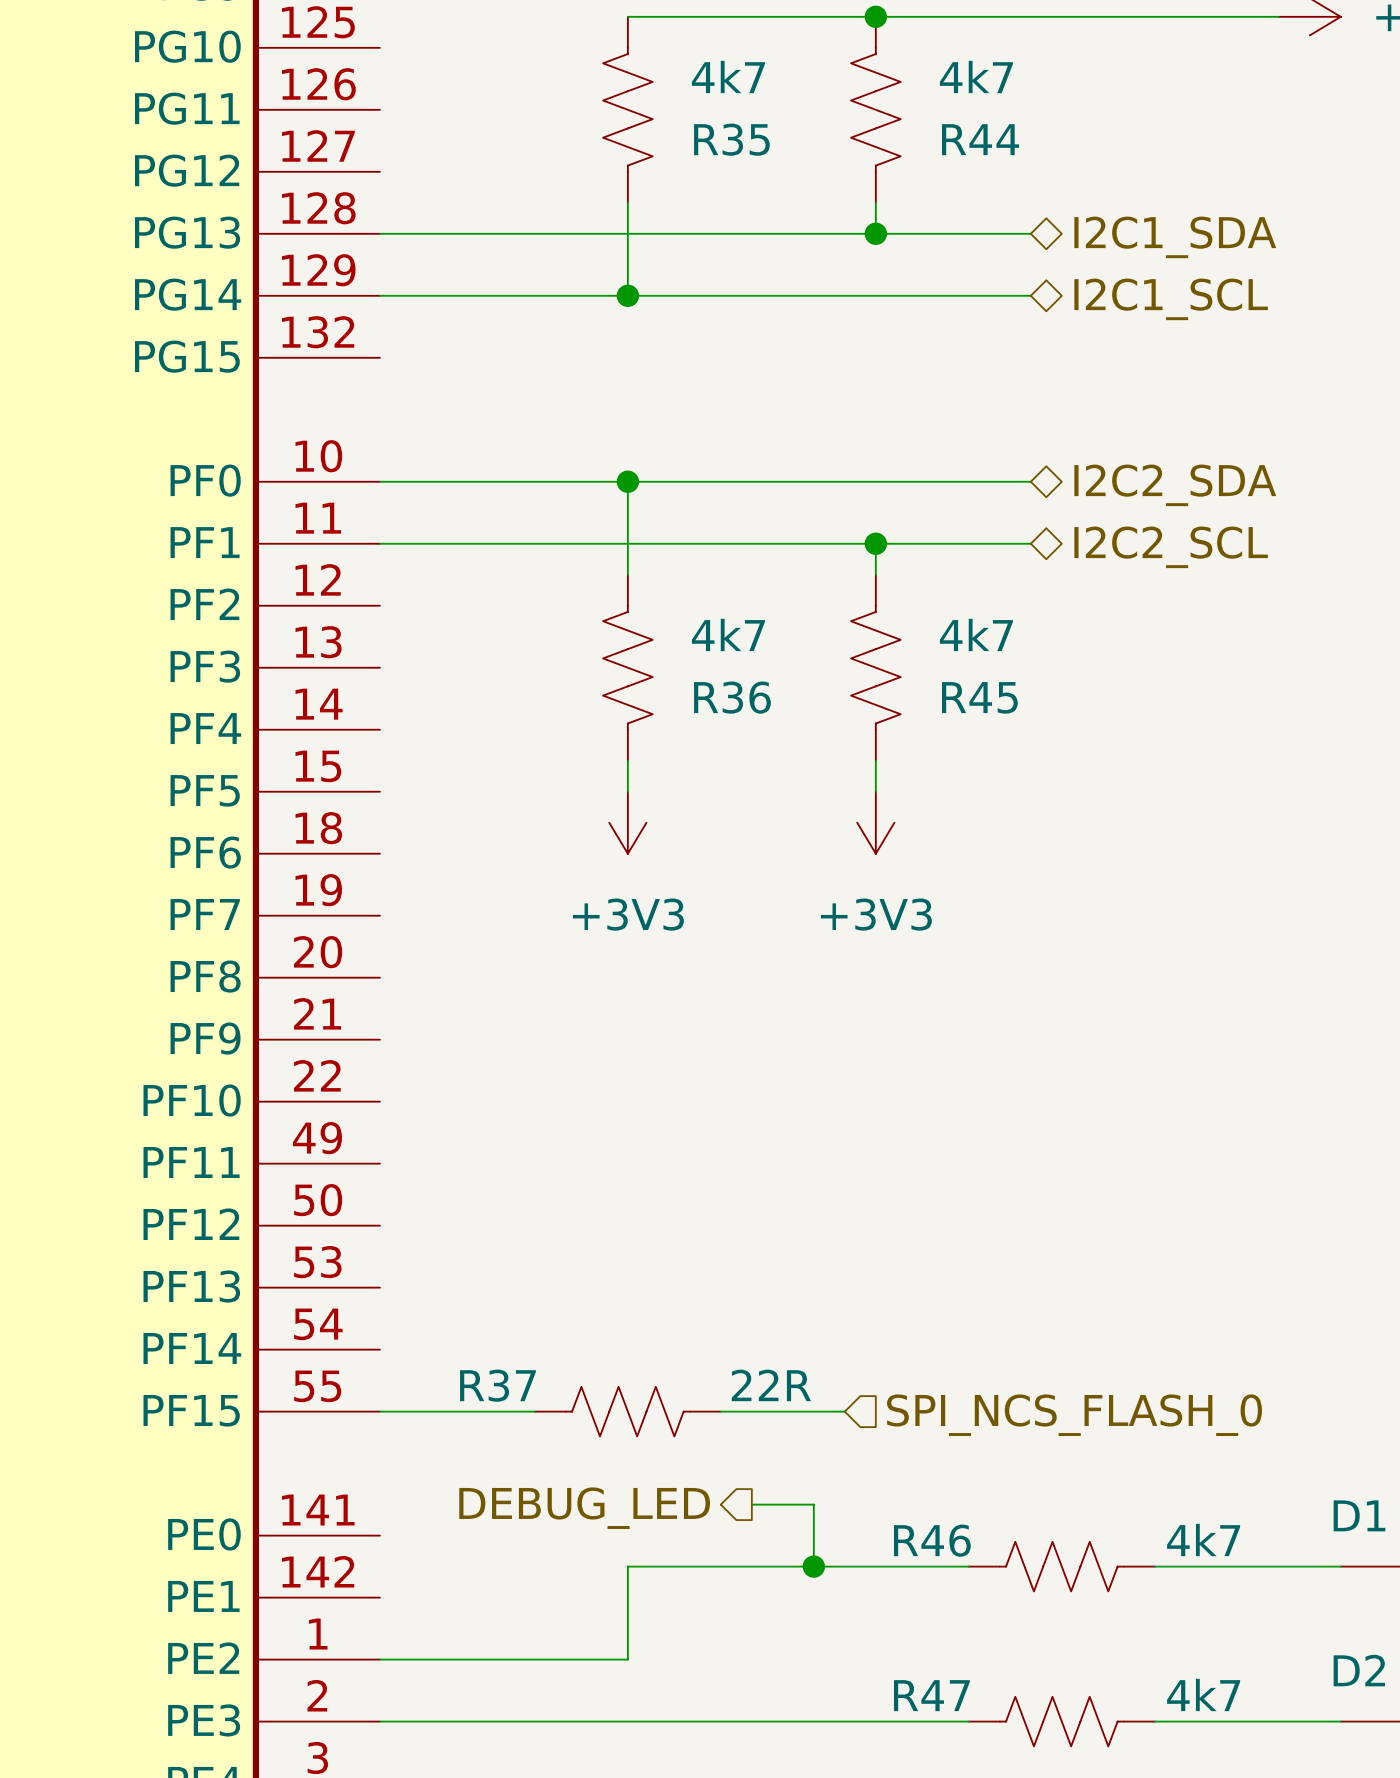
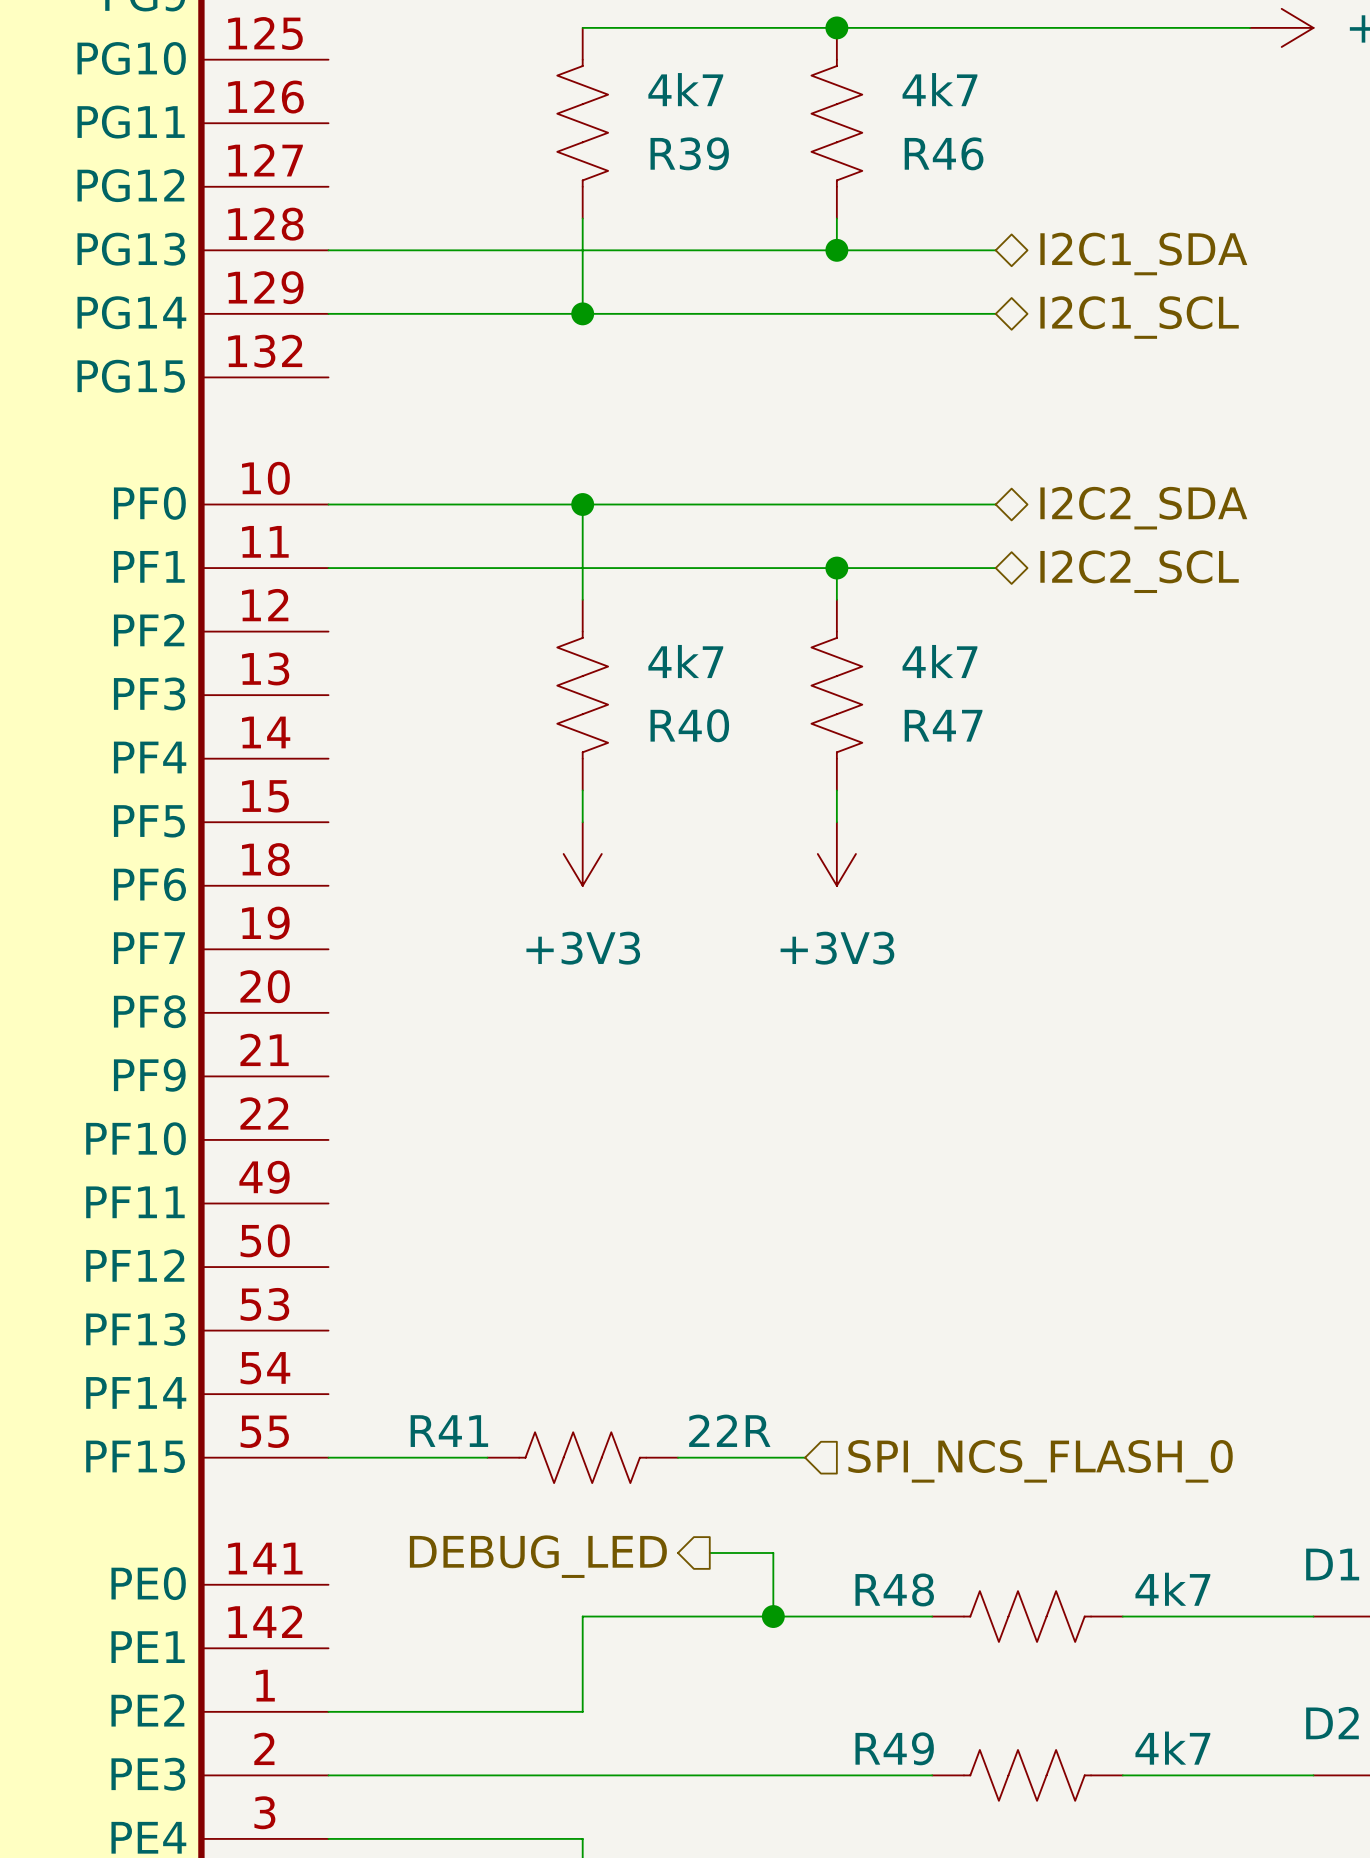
R35 name: R35 (731, 139) -> R39 (689, 153)
R44 name: R44 (980, 139) -> R46 (944, 153)
R36 name: R36 (732, 697) -> R40 (689, 725)
R45 name: R45 (979, 697) -> R47 (943, 725)
R37 name: R37 (497, 1385) -> R41 (449, 1431)
R46 name: R46 (932, 1540) -> R48 (894, 1589)
R47 name: R47 (931, 1695) -> R49 (894, 1748)

